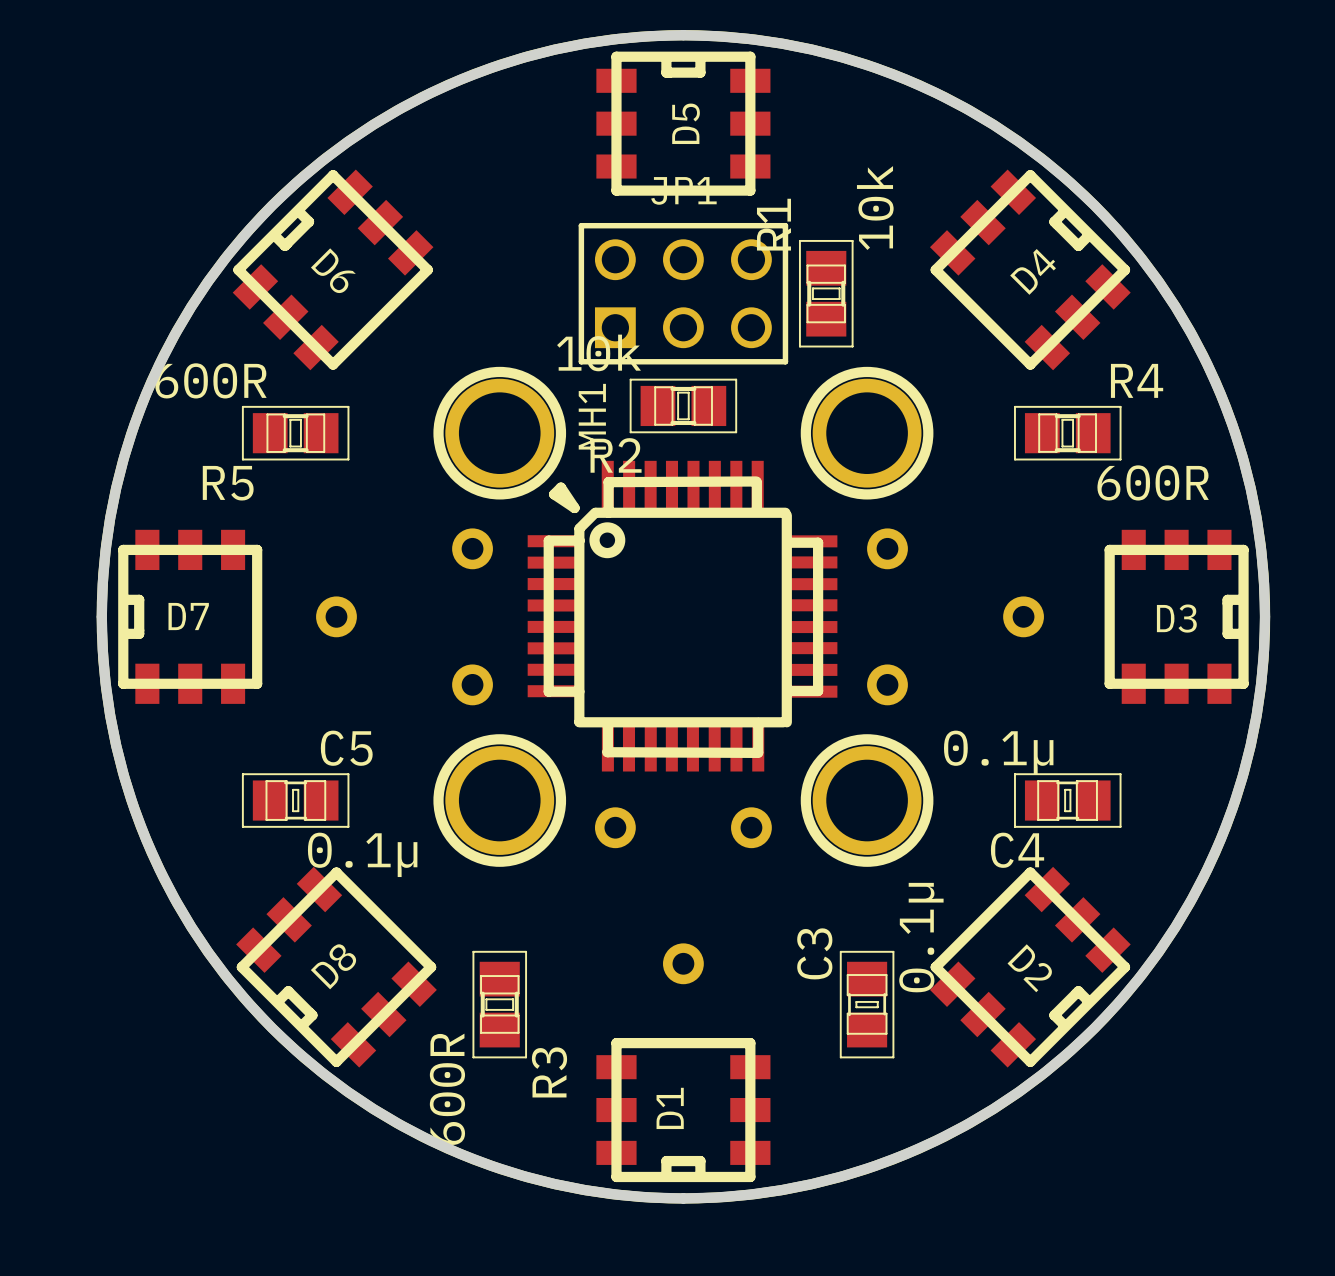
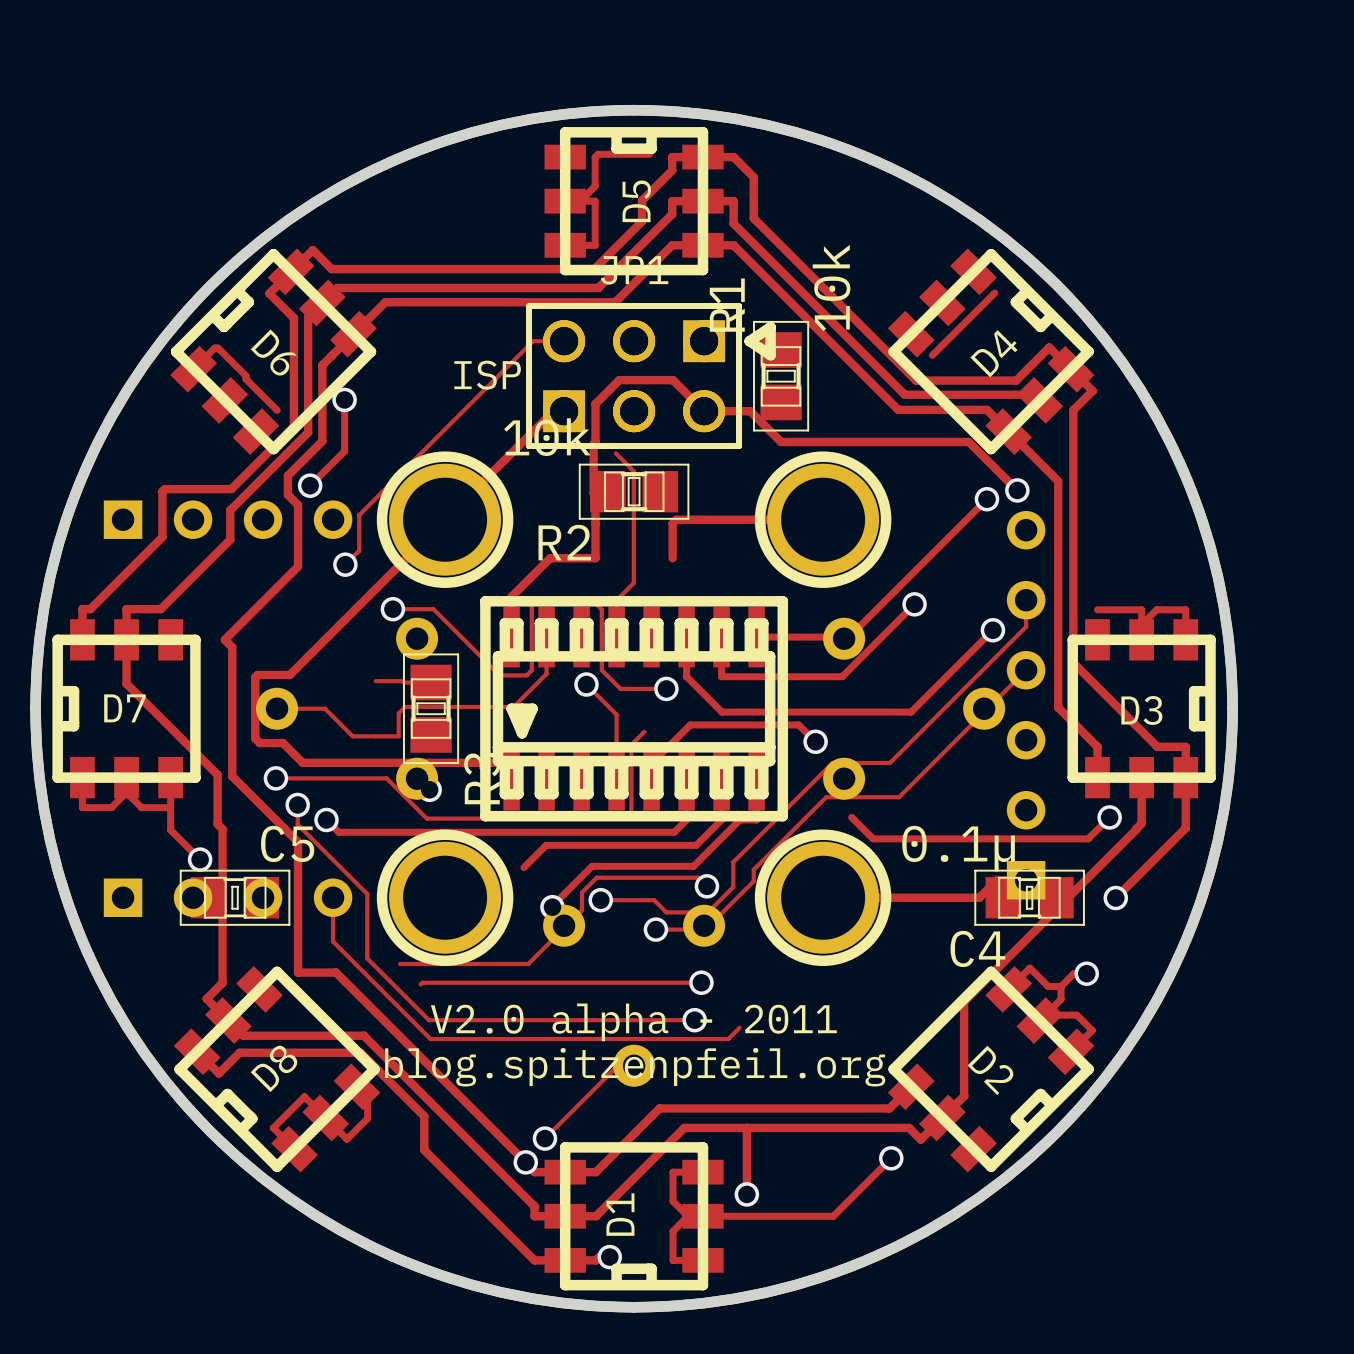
track: none -> (649, 154) (597, 154) (595, 157) (595, 186) (580, 201)
track: none -> (565, 201) (595, 201) (595, 245) (565, 245)
track: none -> (994, 293) (932, 355)
line: none -> (770, 327) (770, 355) (749, 341) (770, 327)
track: none -> (564, 341) (533, 341) (359, 515) (359, 550) (345, 564)
track: none -> (193, 369) (214, 348) (218, 348) (277, 410)
part: none -> ISP (634, 376)
track: none -> (344, 399) (344, 451) (310, 485)
via: none -> (344, 399)
track: none -> (1039, 400) (1034, 394) (904, 394) (733, 223) (733, 201) (672, 201) (672, 214) (598, 287) (337, 287) (308, 317) (308, 432) (230, 510) (230, 539) (160, 609) (126, 609) (126, 683) (217, 774) (217, 824) (222, 829) (222, 982) (206, 998) (243, 1035) (363, 1035) (534, 1206) (534, 1216) (595, 1216) (684, 1127) (908, 1127) (920, 1139) (964, 1096) (964, 1001) (1141, 823) (1141, 777)
track: none -> (564, 411) (553, 411) (289, 674) (257, 674) (255, 677) (255, 738) (259, 743) (282, 743) (302, 762) (496, 762) (511, 747) (511, 780)
track: none -> (615, 453) (633, 471) (633, 583) (616, 600) (616, 637)
via: none -> (310, 485)
track: none -> (1017, 490) (968, 442) (781, 442) (750, 411) (704, 411) (673, 380) (619, 380) (595, 403) (595, 442) (593, 444) (593, 493) (595, 495)
via: none -> (1017, 490)
track: none -> (595, 495) (595, 558) (550, 558) (511, 596) (511, 637)
track: none -> (986, 499) (849, 637) (756, 637)
via: none -> (986, 499)
MH1 name: MH1 (592, 416) -> none
part: none -> (228, 519)
R5: 600R (295, 433) -> none
track: none -> (823, 519) (676, 519) (672, 523) (672, 558)
R4: 600R (1067, 433) -> none
part footprint: [527, 460, 838, 772] -> [480, 596, 789, 822]
via: none -> (345, 564)
track: none -> (1026, 600) (1026, 626) (889, 762) (832, 762) (733, 862) (733, 887) (708, 912) (666, 912) (654, 900) (600, 900)
track: none -> (914, 604) (842, 676) (721, 676) (721, 637)
via: none -> (914, 604)
track: none -> (392, 609) (433, 609) (499, 675) (526, 675) (531, 670) (531, 604) (535, 600) (592, 600) (601, 609) (601, 670) (620, 688) (666, 688)
via: none -> (392, 609)
track: none -> (1097, 609) (1141, 609) (1141, 639)
track: none -> (1141, 624) (1156, 609) (1185, 609) (1185, 639)
track: none -> (992, 630) (911, 712) (721, 712) (686, 676) (686, 637)
via: none -> (992, 630)
track: none -> (546, 637) (546, 673) (513, 706) (405, 706) (398, 713) (398, 736) (352, 736) (325, 708) (286, 708)
track: none -> (82, 639) (82, 609) (90, 609) (162, 537) (162, 491) (164, 489) (231, 489) (293, 426) (293, 318) (269, 293) (312, 250) (331, 269) (594, 269) (642, 221) (642, 200) (672, 170) (672, 157) (733, 157) (753, 177) (753, 218) (915, 380) (1016, 380) (1049, 347) (1092, 390) (1073, 410) (1073, 662) (1157, 746) (1185, 746) (1185, 828) (1115, 898)
track: none -> (1026, 670) (899, 797) (826, 797) (753, 869) (753, 881) (705, 929) (655, 929)
track: none -> (375, 681) (431, 682)
track: none -> (586, 684) (616, 714) (616, 780)
via: none -> (586, 684)
via: none -> (666, 688)
part: none -> (1026, 705)
track: none -> (644, 731) (631, 744) (631, 813) (626, 818) (426, 818) (386, 778) (275, 778)
track: none -> (815, 741) (798, 724) (690, 724) (651, 763) (651, 780)
via: none -> (815, 741)
track: none -> (82, 777) (82, 807) (111, 807) (126, 792)
track: none -> (170, 777) (170, 830) (200, 859)
track: none -> (1097, 777) (1097, 746) (1058, 707) (1058, 481) (986, 409) (898, 409) (733, 245) (672, 245) (615, 302) (385, 302) (322, 365) (322, 441) (287, 475) (287, 494) (298, 505) (298, 566) (224, 639) (232, 647) (232, 776) (298, 842) (298, 972) (336, 972) (534, 1172) (595, 1172) (659, 1108) (889, 1108) (911, 1086)
via: none -> (275, 778)
track: none -> (686, 780) (686, 819) (674, 832) (338, 832) (326, 819)
track: none -> (721, 780) (721, 819) (696, 845) (546, 845) (523, 867)
track: none -> (756, 780) (756, 819) (739, 819) (693, 866) (592, 866) (552, 907)
via: none -> (429, 789)
track: none -> (126, 792) (141, 807) (170, 807)
track: none -> (297, 804) (297, 824) (367, 894) (367, 958) (428, 1020) (694, 1020)
via: none -> (297, 804)
track: none -> (851, 817) (873, 838) (1088, 838) (1109, 817)
via: none -> (1109, 817)
via: none -> (326, 819)
via: none -> (200, 859)
track: none -> (1026, 880) (996, 880) (979, 897) (823, 897)
track: none -> (706, 886) (698, 877) (596, 877) (582, 892) (582, 910) (528, 963) (400, 963)
via: none -> (706, 886)
part: none -> (228, 897)
track: none -> (333, 897) (333, 941) (430, 1039) (728, 1039) (739, 1027)
via: none -> (1115, 898)
via: none -> (600, 900)
via: none -> (552, 907)
via: none -> (655, 929)
C5 value: 0.1µ (362, 854) -> none
track: none -> (1086, 973) (1073, 973) (1061, 986)
via: none -> (1086, 973)
track: none -> (701, 982) (422, 982) (420, 984)
via: none -> (701, 982)
track: none -> (1061, 986) (1061, 999) (1039, 1020)
track: none -> (1061, 986) (1048, 986) (1029, 968) (1008, 989)
track: none -> (1050, 1009) (1055, 1015) (1076, 1015) (1092, 1030) (1070, 1051)
via: none -> (694, 1020)
text: none -> V2.0 alpha - 2011 (633, 1022)
track: none -> (197, 1051) (218, 1073) (239, 1052) (360, 1052) (424, 1116) (424, 1150) (534, 1260) (595, 1260) (599, 1257) (609, 1257)
track: none -> (627, 1058) (624, 1058) (544, 1138)
text: none -> blog.spitzenpfeil.org (635, 1067)
track: none -> (367, 1097) (367, 1118) (346, 1139) (304, 1096) (273, 1127) (294, 1149)
R3 position: (499, 1004) -> (431, 708)
C3: 0.1µ (867, 1004) -> none
track: none -> (746, 1127) (746, 1194)
via: none -> (544, 1138)
track: none -> (891, 1158) (833, 1216) (687, 1216)
via: none -> (891, 1158)
via: none -> (525, 1162)
track: none -> (702, 1172) (673, 1172) (673, 1201) (687, 1216)
via: none -> (746, 1194)
R3 value: 600R (447, 1089) -> none
track: none -> (687, 1216) (673, 1231) (673, 1260) (702, 1260)
via: none -> (609, 1257)

